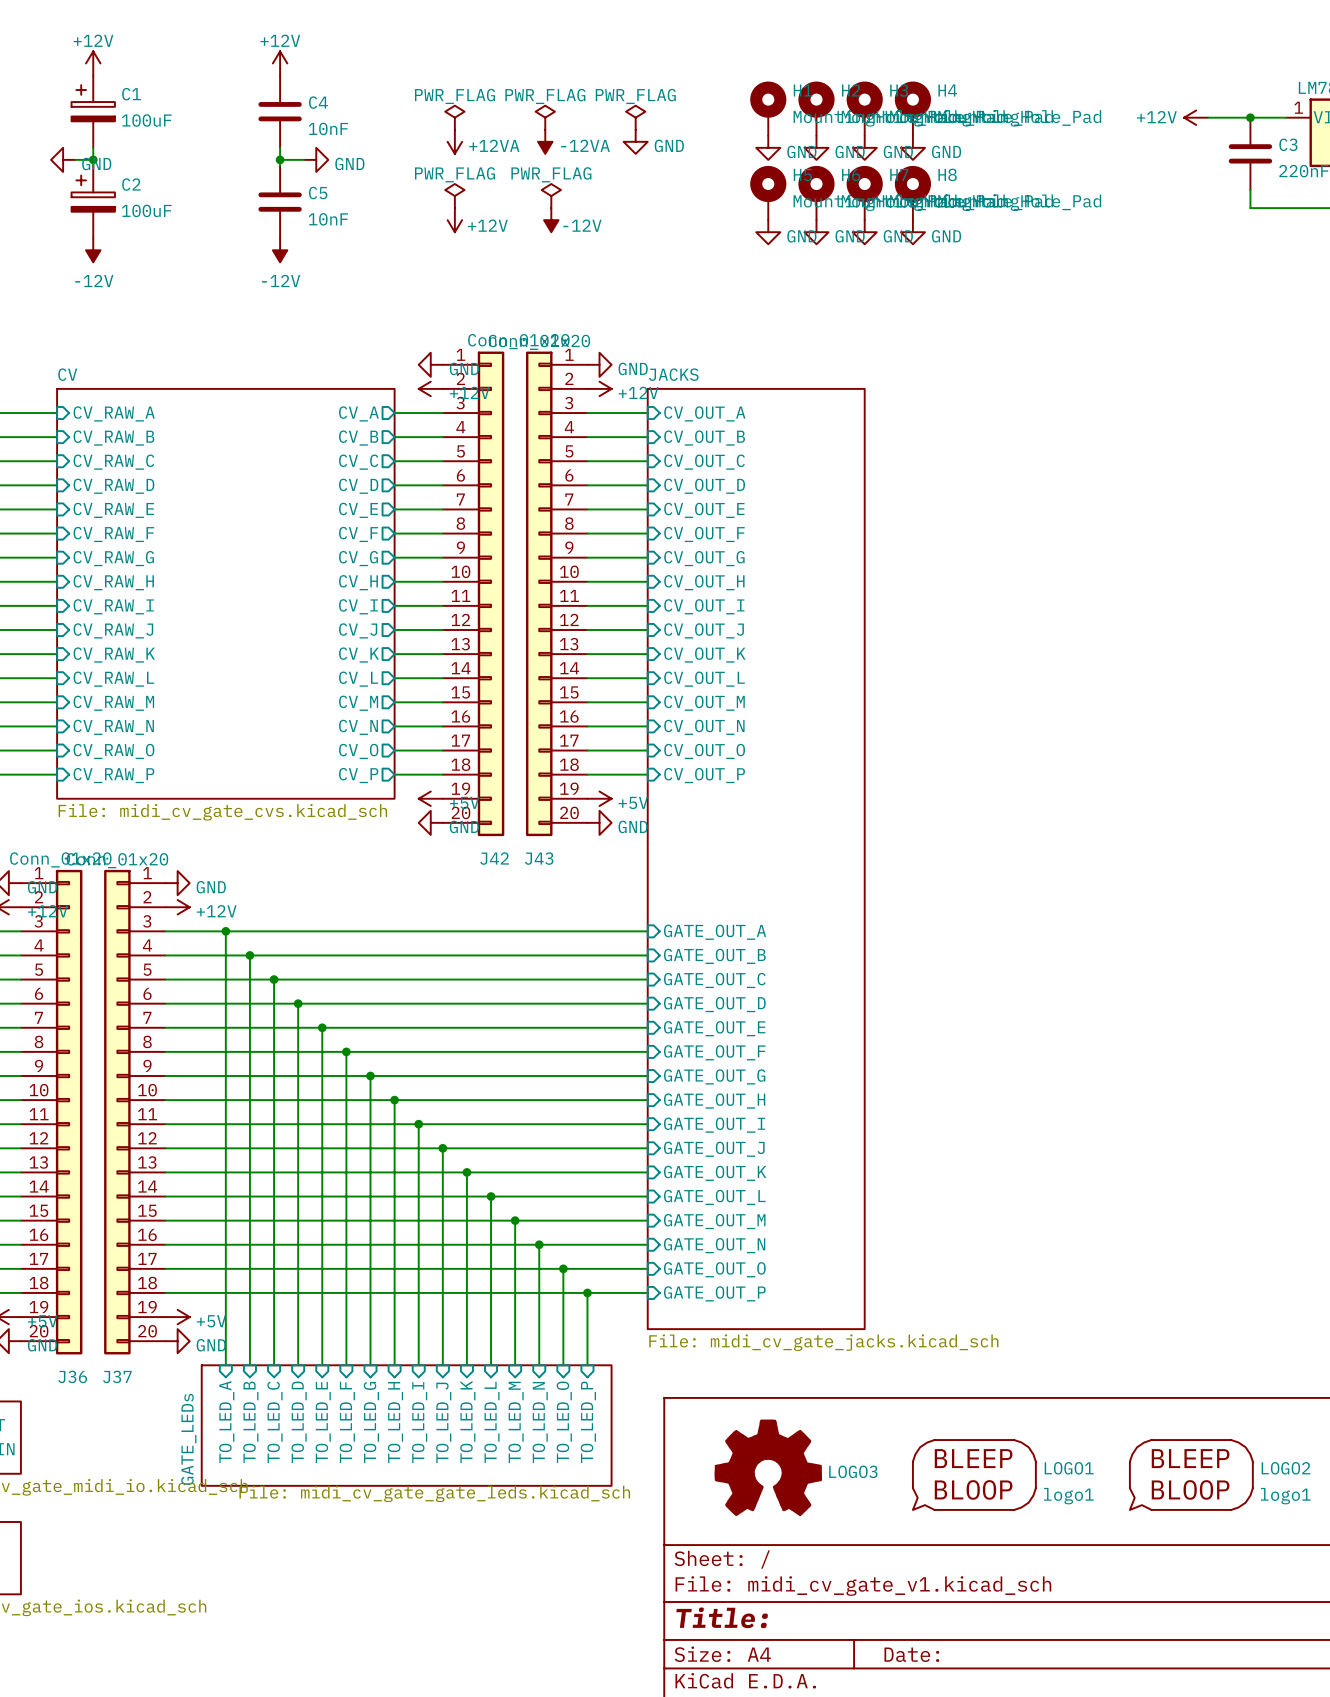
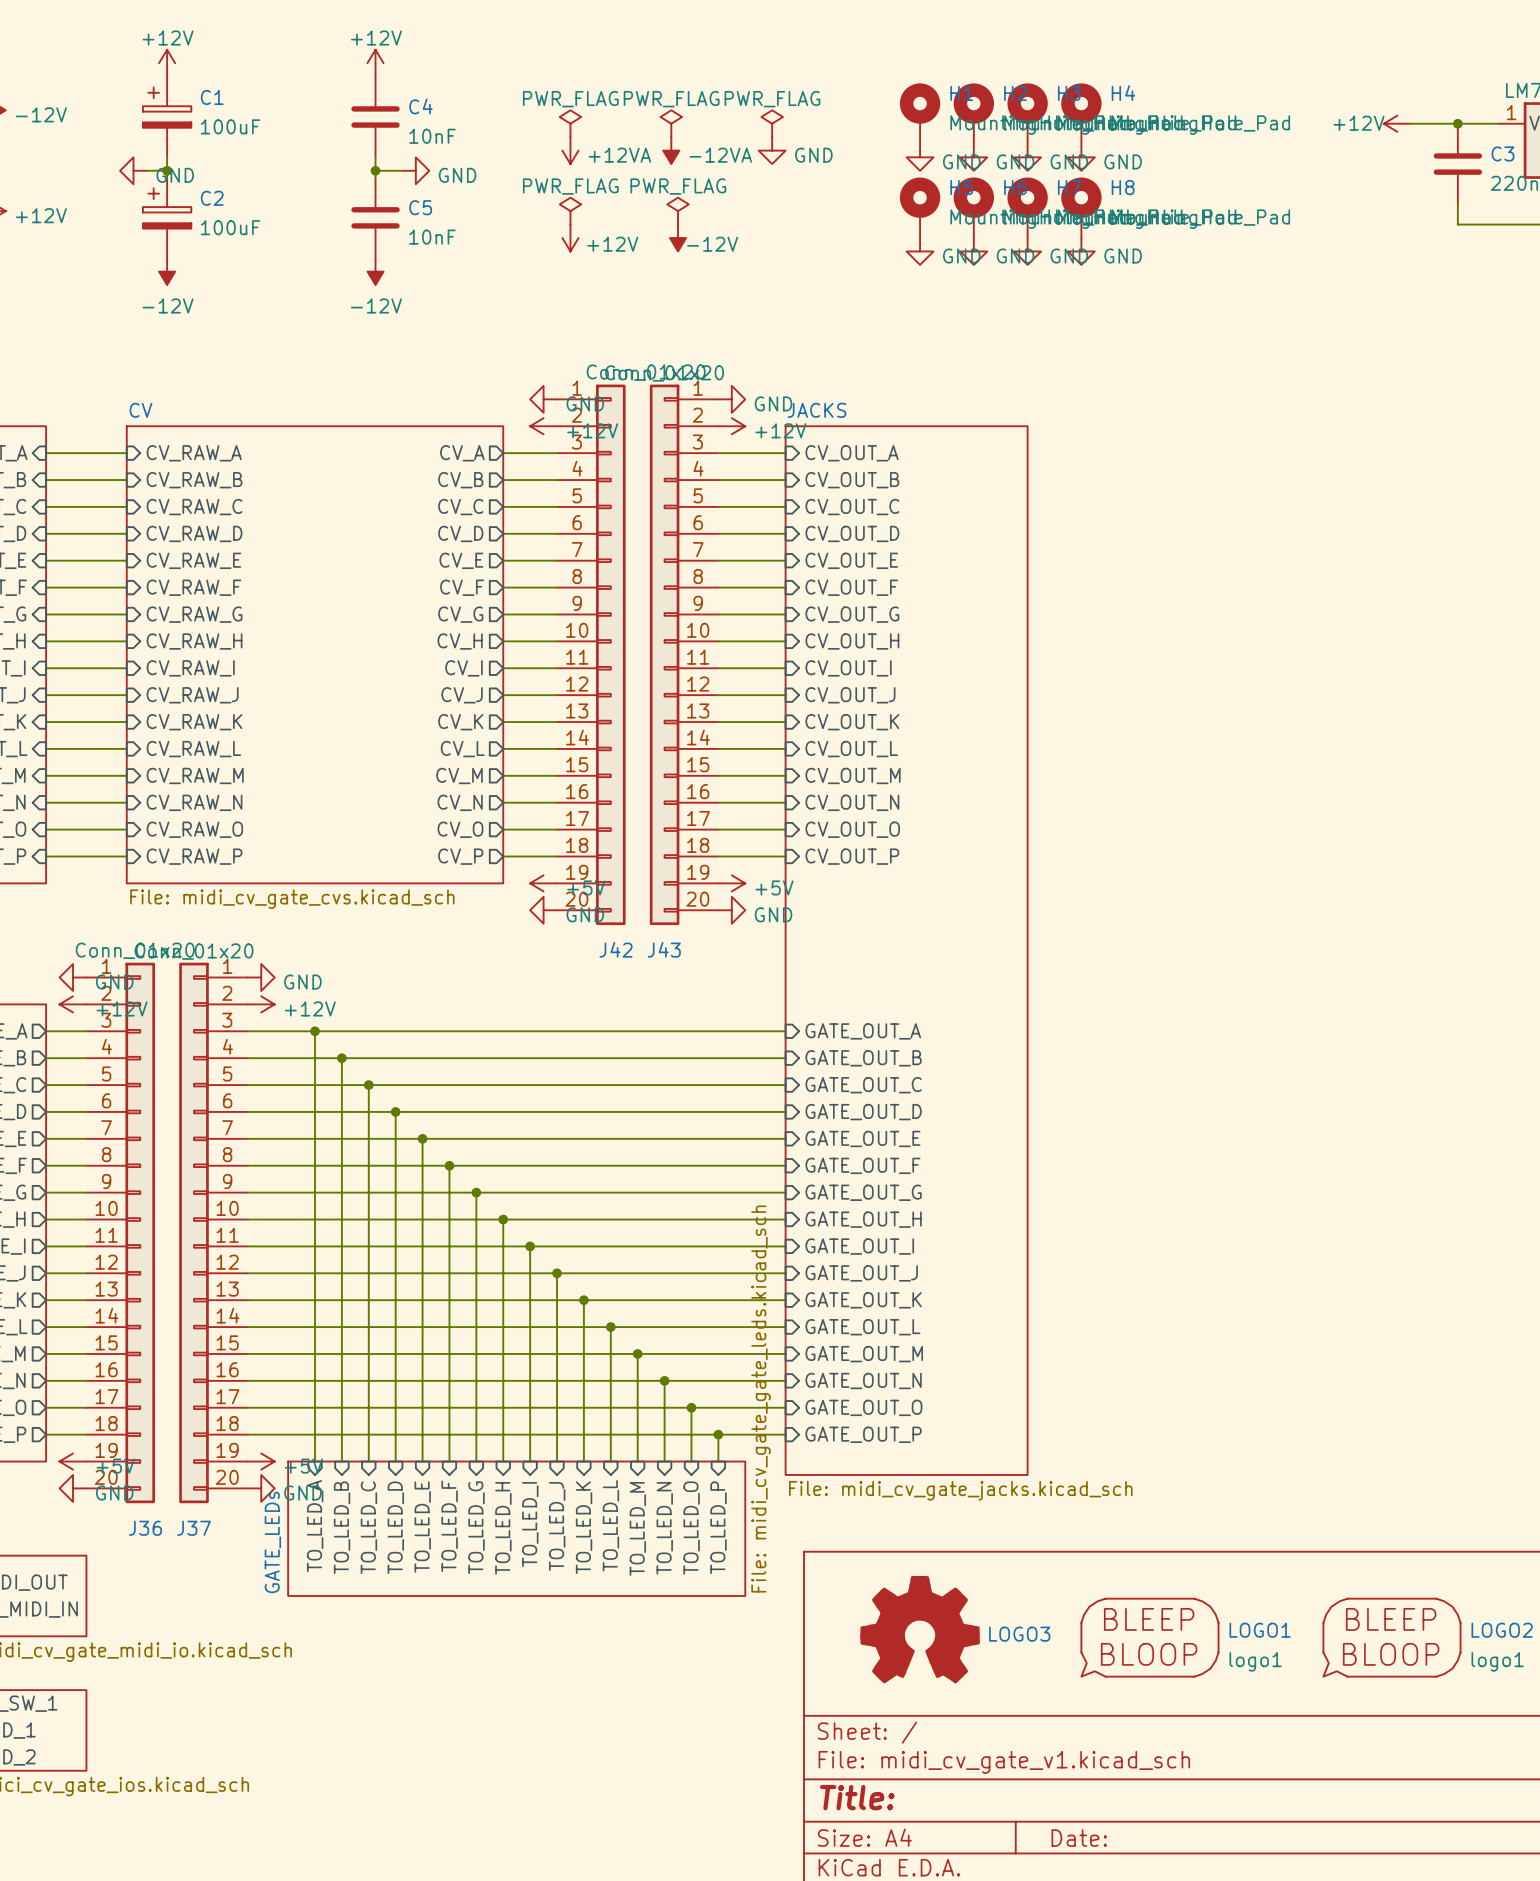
wire: (225, 1317) (225, 1365) -> none
wire: (249, 1317) (249, 1365) -> none
wire: (274, 1317) (274, 1365) -> none
wire: (298, 1317) (298, 1365) -> none
wire: (322, 1317) (322, 1365) -> none
wire: (346, 1317) (346, 1365) -> none
wire: (370, 1317) (370, 1365) -> none
wire: (394, 1317) (394, 1365) -> none
wire: (418, 1317) (418, 1365) -> none
wire: (442, 1317) (442, 1365) -> none
wire: (466, 1317) (466, 1365) -> none
wire: (491, 1317) (491, 1365) -> none
wire: (515, 1317) (515, 1365) -> none
wire: (539, 1317) (539, 1365) -> none
wire: (563, 1317) (563, 1365) -> none
wire: (587, 1317) (587, 1365) -> none
sheet pin position: TO_LED_A (226, 1422) -> TO_LED_A (315, 1526)
sheet pin position: TO_LED_B (250, 1422) -> TO_LED_B (342, 1527)
sheet pin position: TO_LED_C (274, 1422) -> TO_LED_C (368, 1527)
sheet pin position: TO_LED_D (299, 1422) -> TO_LED_D (395, 1527)
sheet pin position: TO_LED_E (323, 1422) -> TO_LED_E (422, 1527)
sheet pin position: TO_LED_F (347, 1422) -> TO_LED_F (449, 1526)
sheet pin position: TO_LED_G (371, 1422) -> TO_LED_G (476, 1527)
sheet pin position: TO_LED_H (395, 1422) -> TO_LED_H (503, 1528)
sheet pin position: TO_LED_I (419, 1422) -> TO_LED_I (530, 1524)
sheet pin position: TO_LED_J (443, 1422) -> TO_LED_J (557, 1526)
sheet pin position: TO_LED_K (467, 1422) -> TO_LED_K (584, 1527)
sheet pin position: TO_LED_L (491, 1422) -> TO_LED_L (610, 1525)
sheet pin position: TO_LED_M (516, 1422) -> TO_LED_M (637, 1528)
sheet pin position: TO_LED_N (540, 1422) -> TO_LED_N (664, 1528)
sheet pin position: TO_LED_O (564, 1422) -> TO_LED_O (691, 1528)
sheet pin position: TO_LED_P (588, 1422) -> TO_LED_P (718, 1527)
sheet GATE_LEDs position: (406, 1425) -> (516, 1528)
sheet GATE_LEDs value rotation: 0° (434, 1493) -> 90° counterclockwise (761, 1399)

